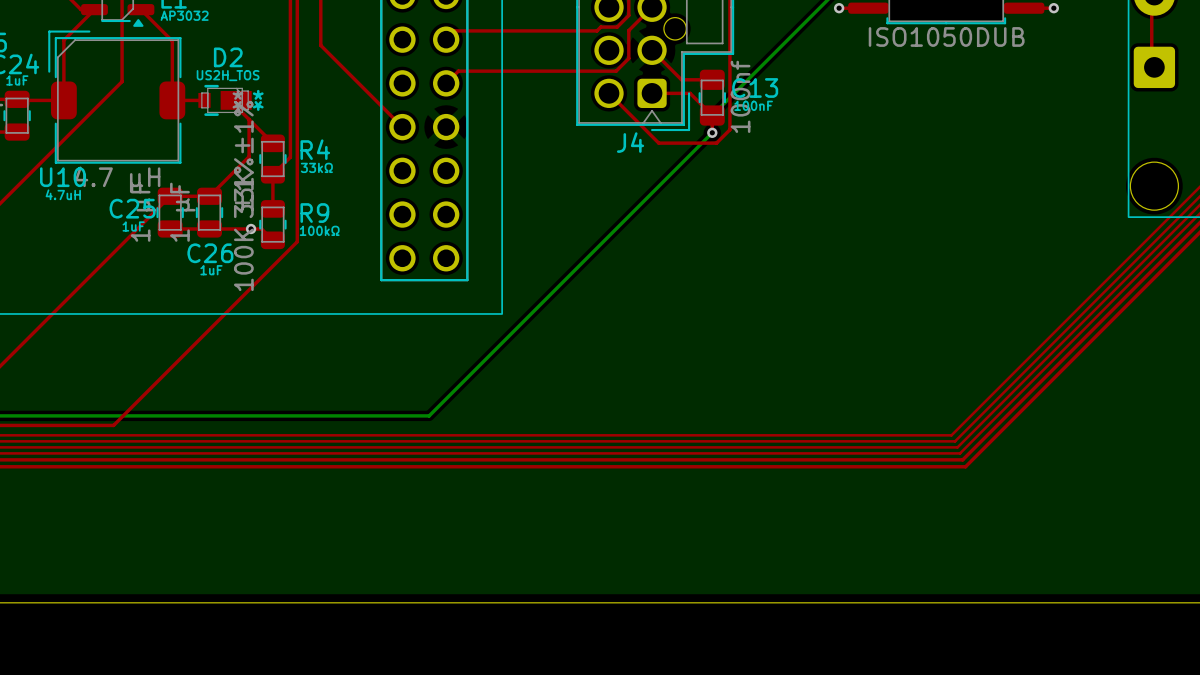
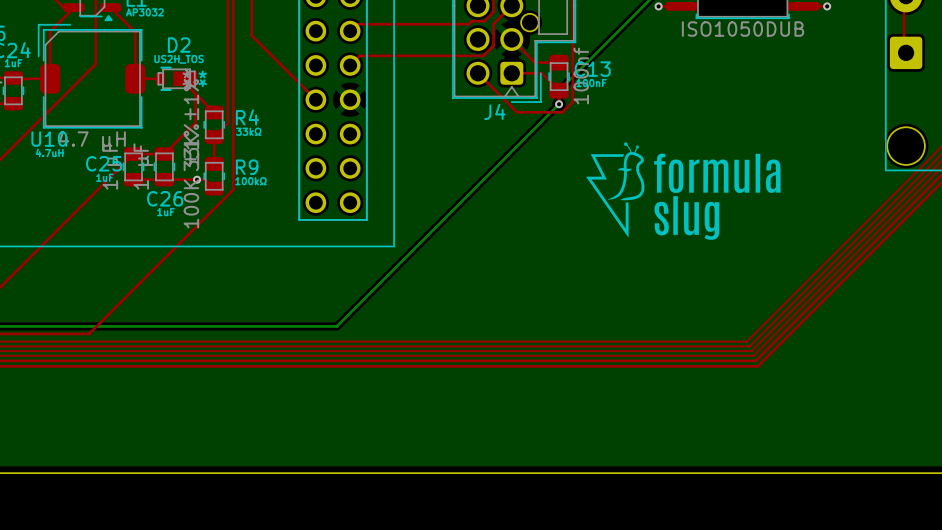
drawing: none -> [586, 142, 781, 240]

